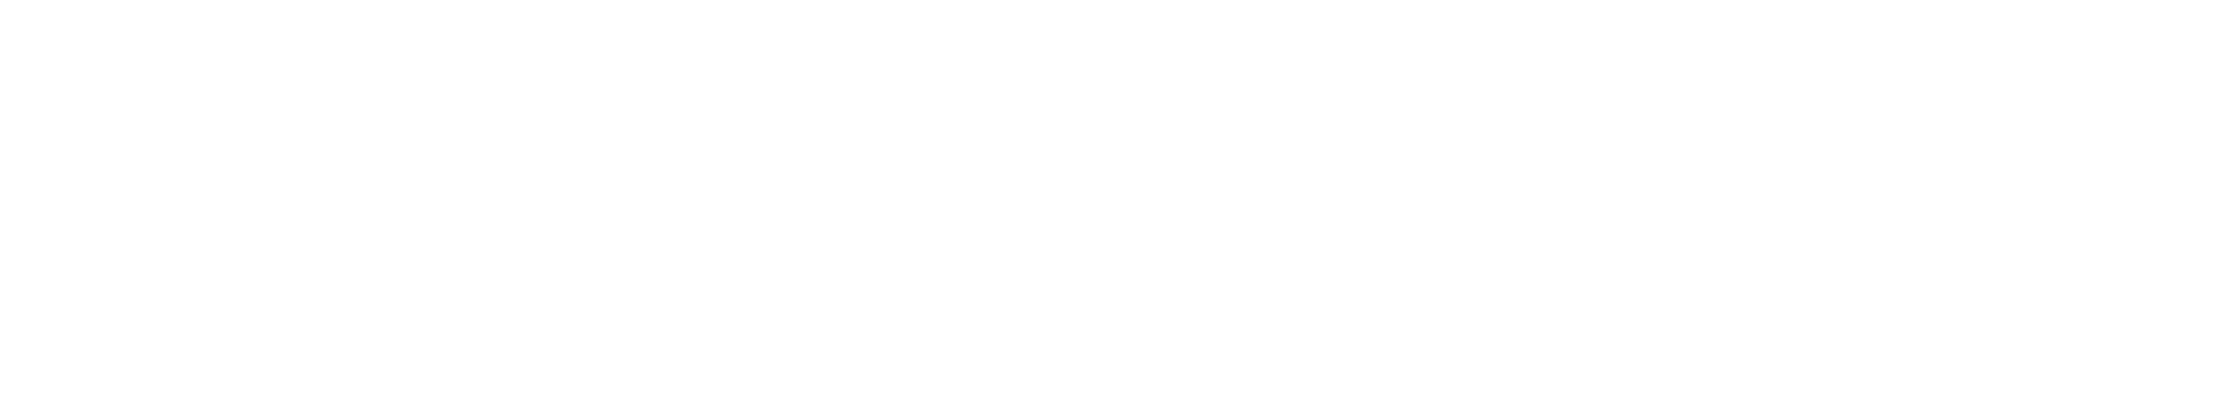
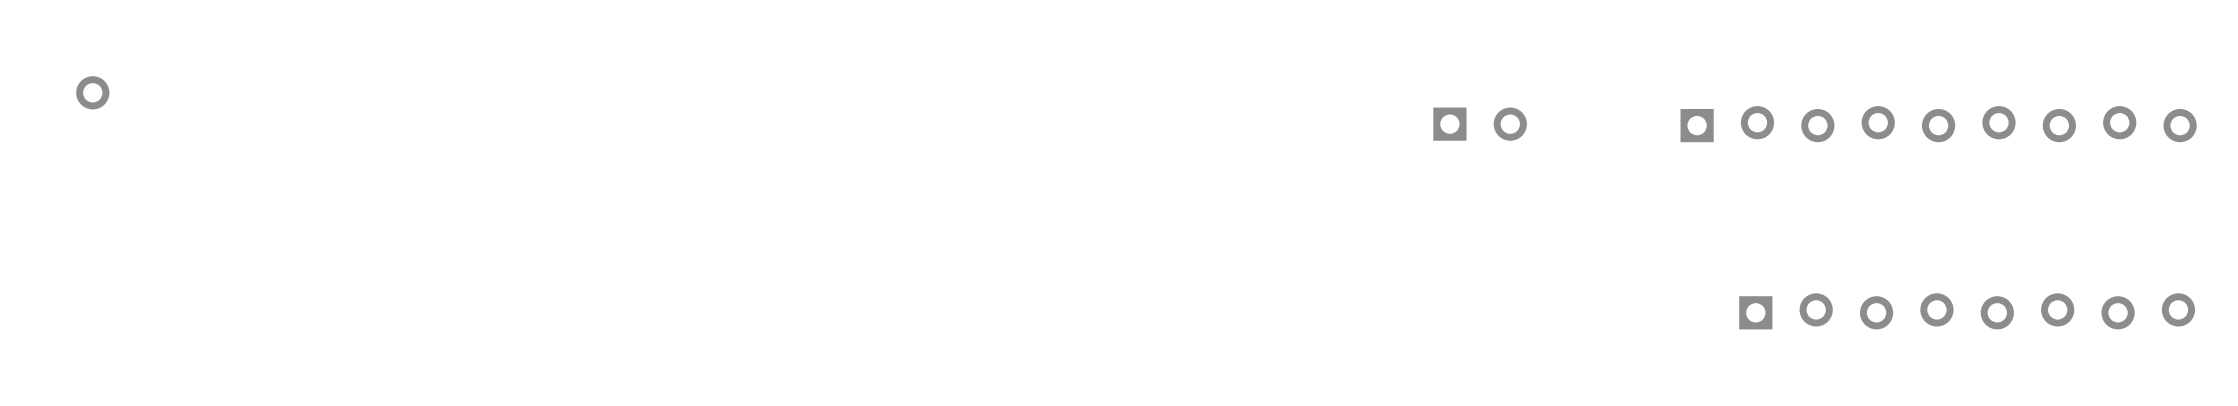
part: none -> (92, 92)
part: none -> (1480, 124)
part: none -> (1938, 124)
part: none -> (1967, 311)

